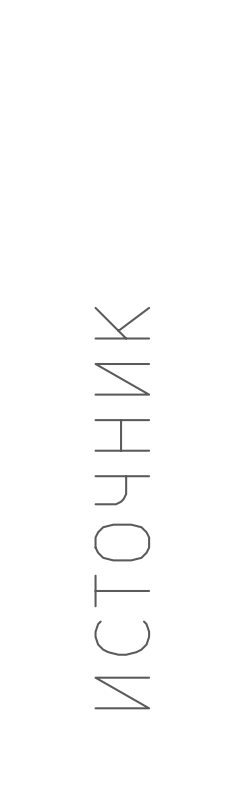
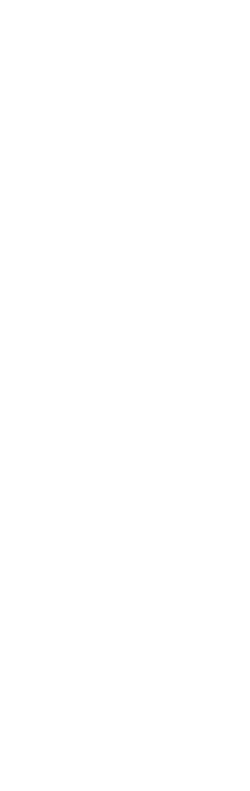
text: ИСТОЧНИК (122, 508) -> none

